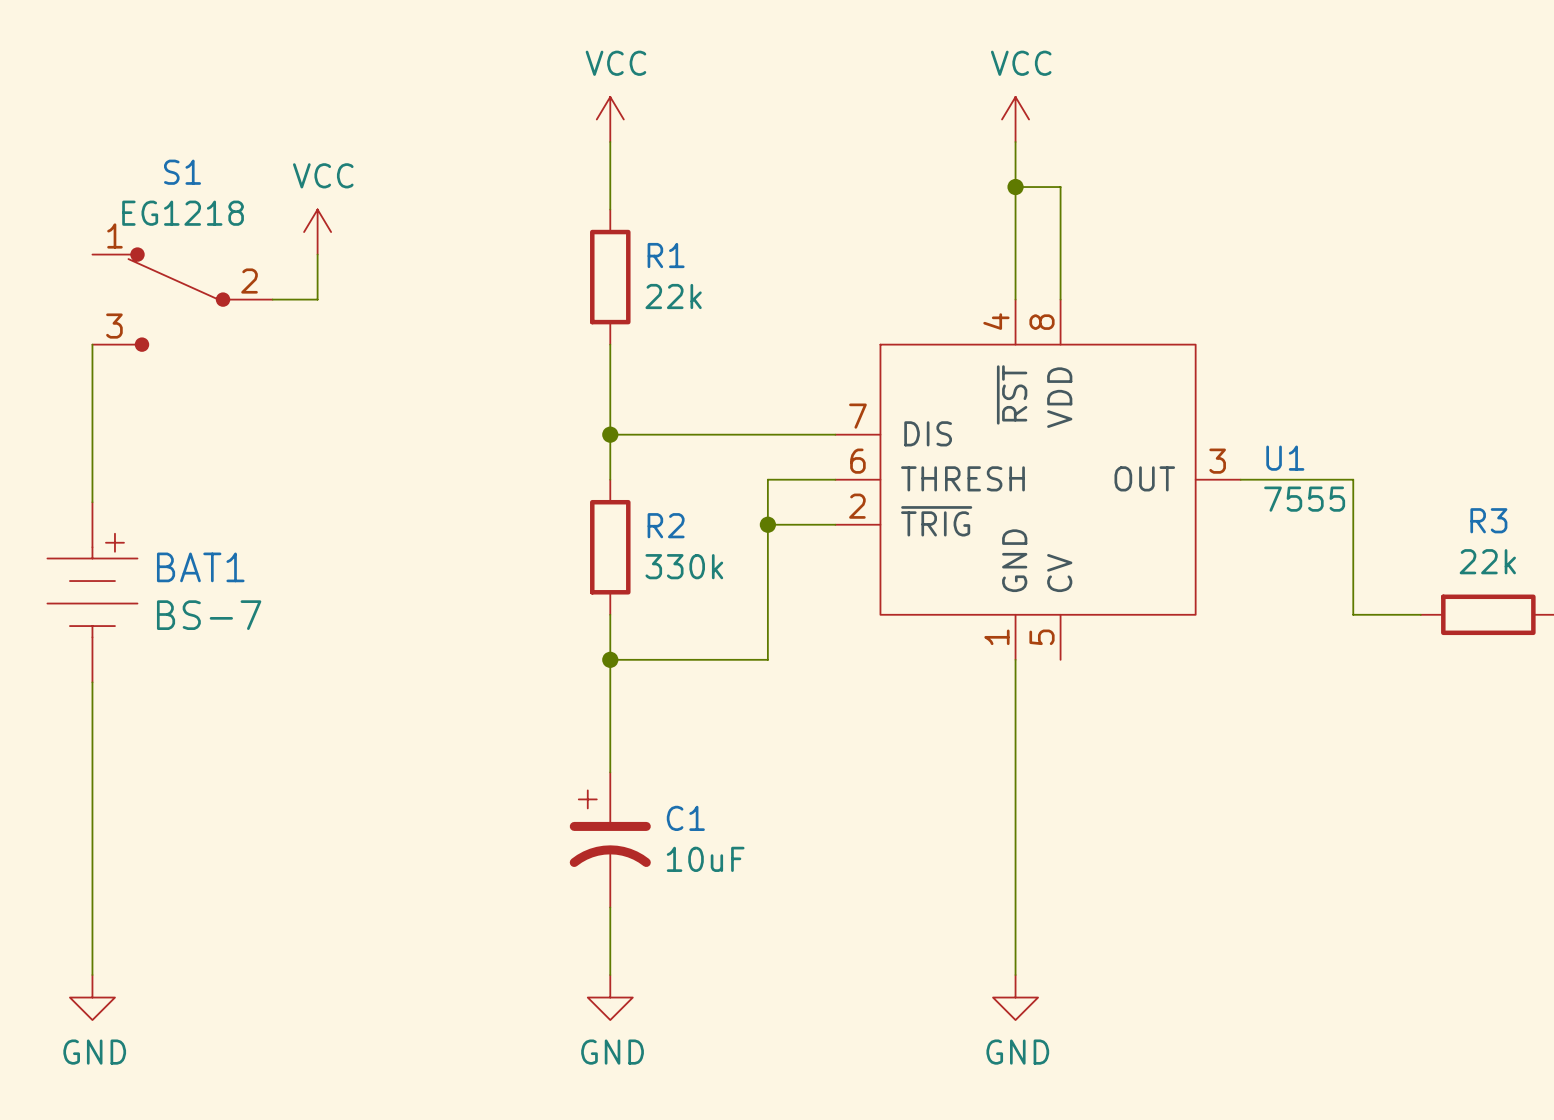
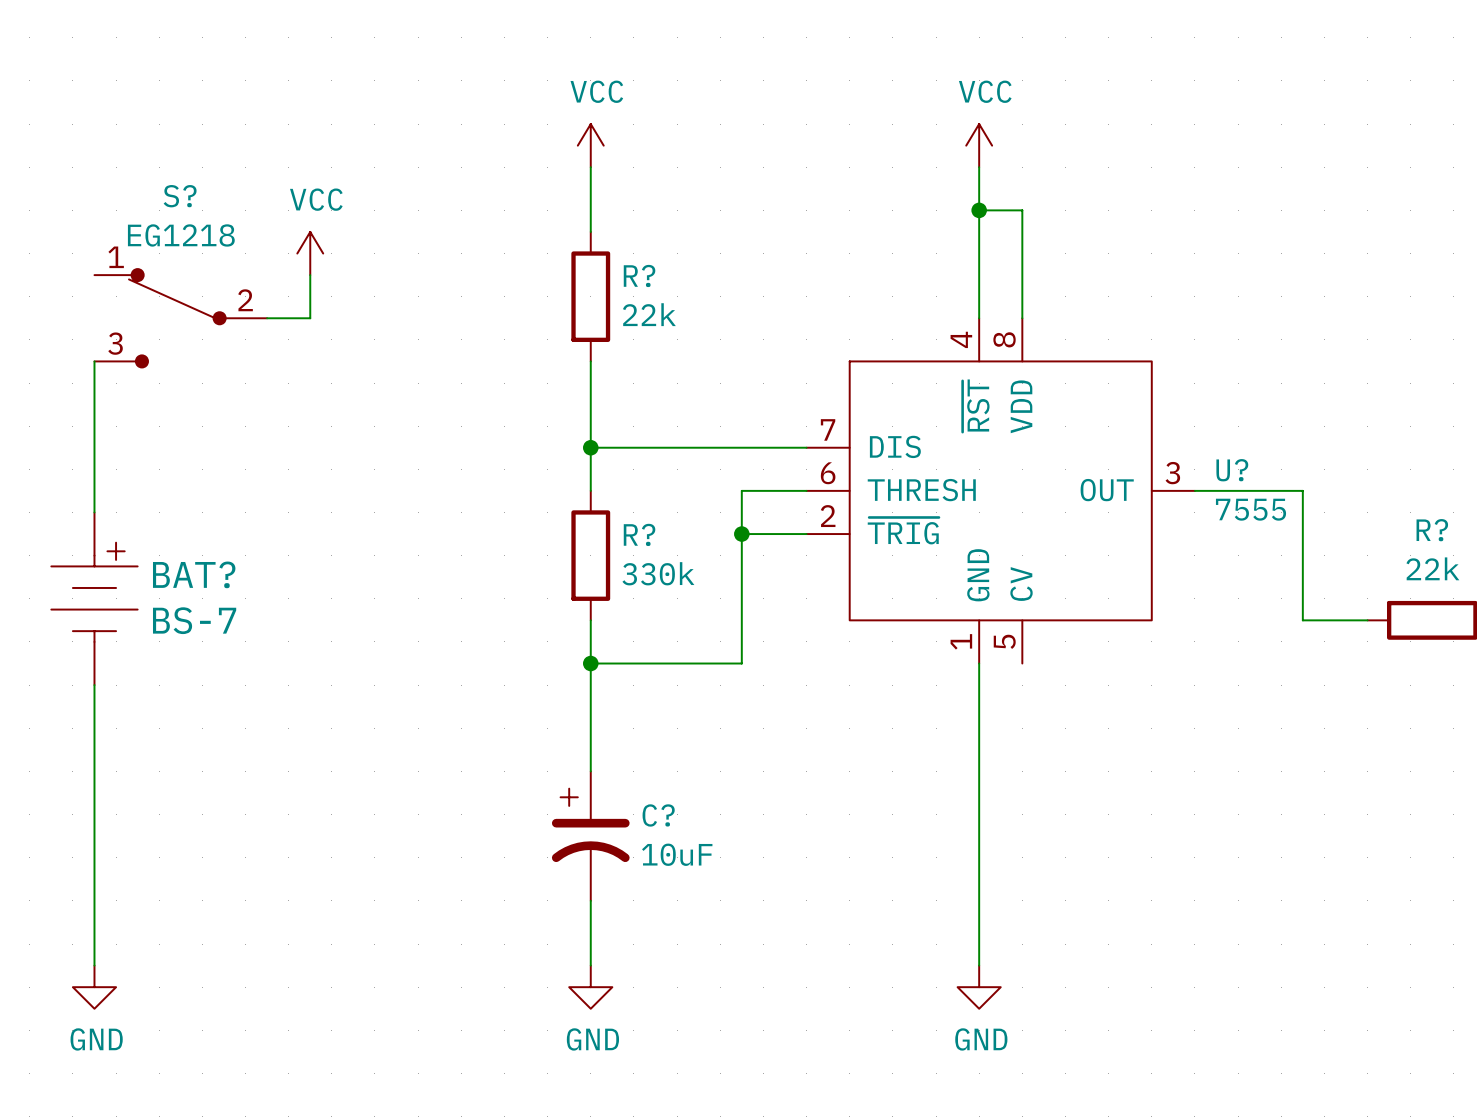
S1 name: S1 (182, 172) -> S? (180, 196)
R1 name: R1 (666, 255) -> R? (639, 275)
U1 name: U1 (1285, 458) -> U? (1232, 470)
R3 name: R3 (1488, 520) -> R? (1432, 530)
R2 name: R2 (666, 525) -> R? (639, 534)
BAT1 name: BAT1 (200, 567) -> BAT? (194, 574)
C1 name: C1 (685, 818) -> C? (658, 815)

